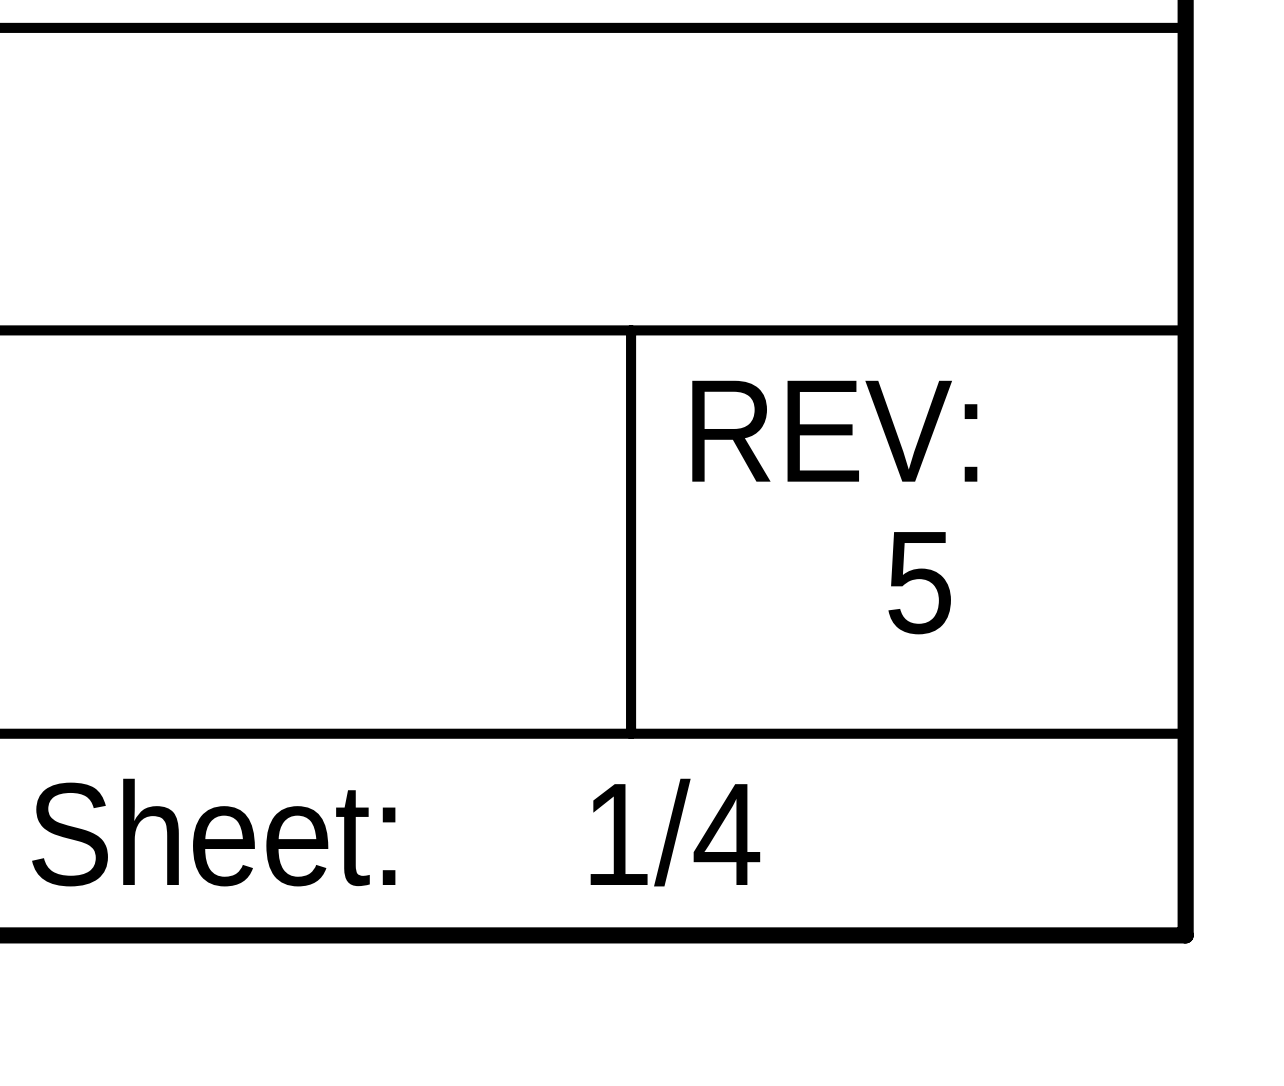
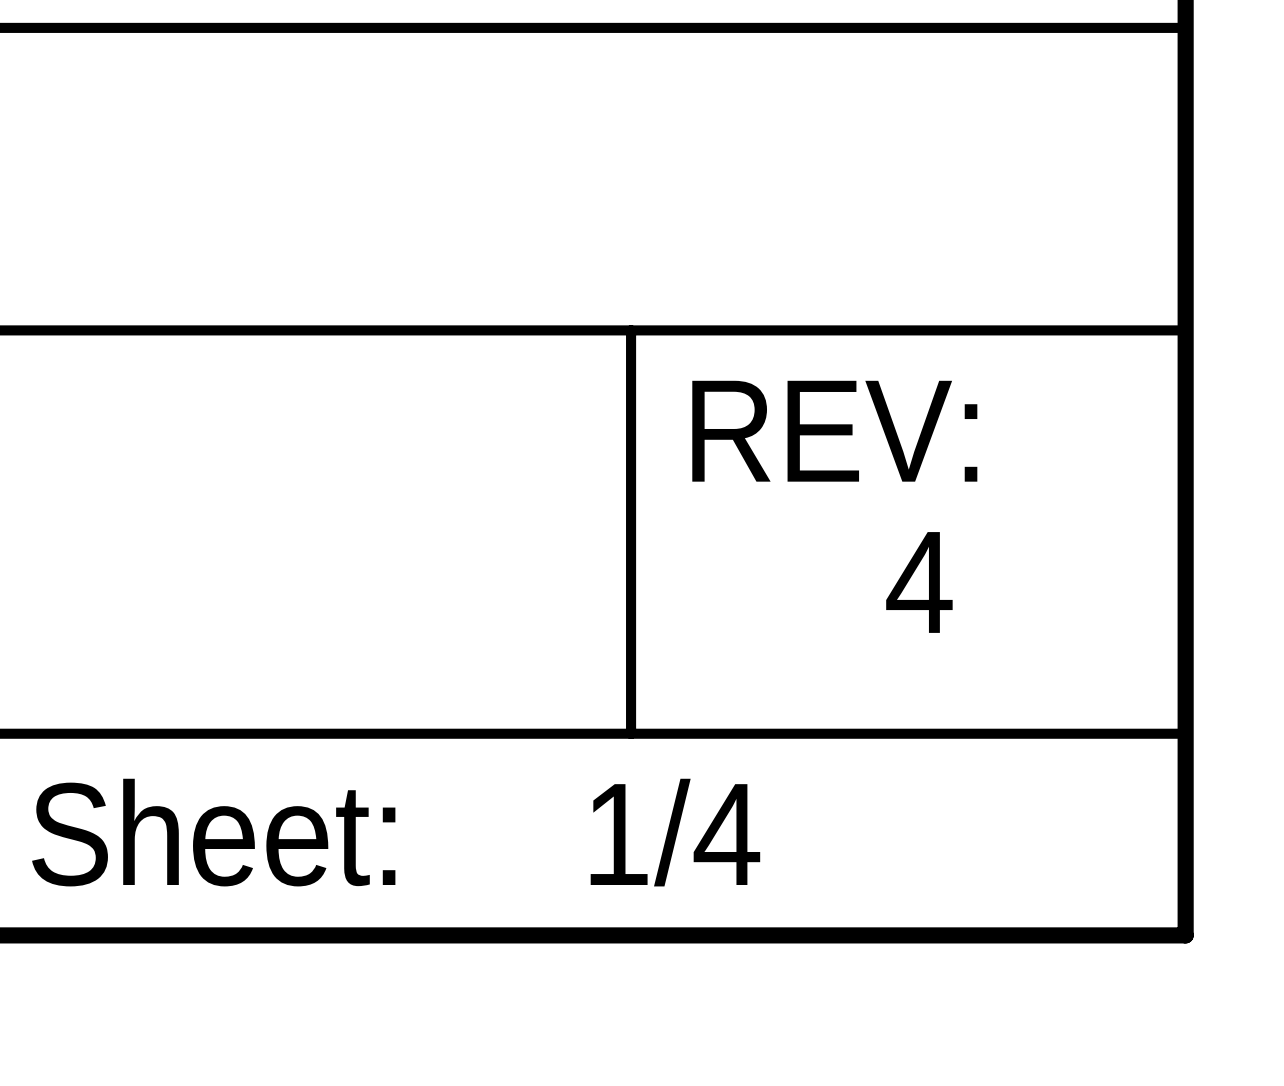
text: 5 (919, 583) -> 4 (919, 582)

